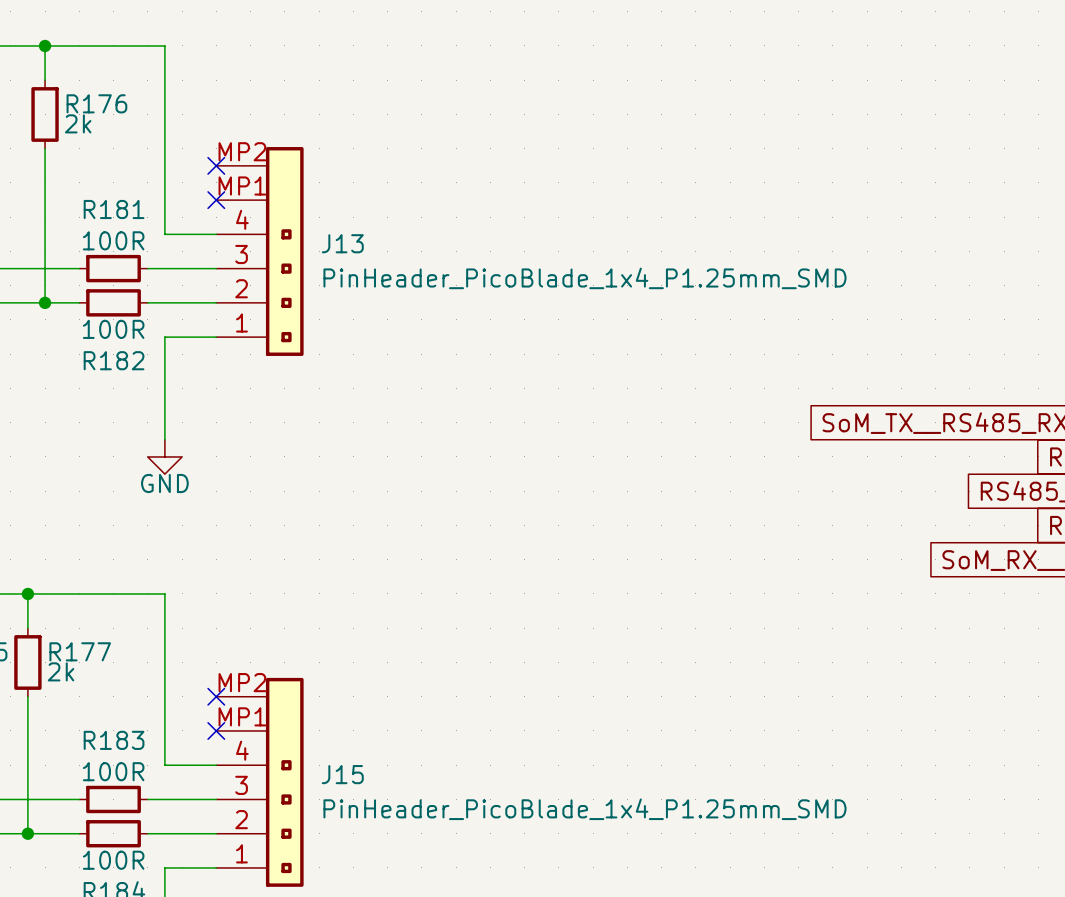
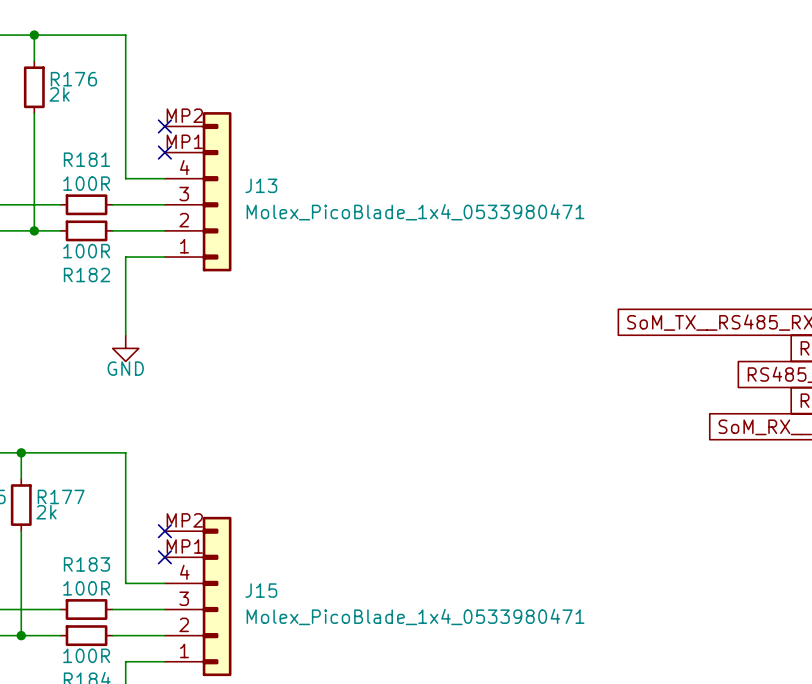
J13 symbol: [216, 147, 304, 356] -> [164, 112, 232, 272]
J13 value: PinHeader_PicoBlade_1x4_P1.25mm_SMD (584, 278) -> Molex_PicoBlade_1x4_0533980471 (415, 212)
J15 symbol: [216, 677, 304, 887] -> [164, 516, 232, 677]
J15 value: PinHeader_PicoBlade_1x4_P1.25mm_SMD (584, 809) -> Molex_PicoBlade_1x4_0533980471 (415, 616)

